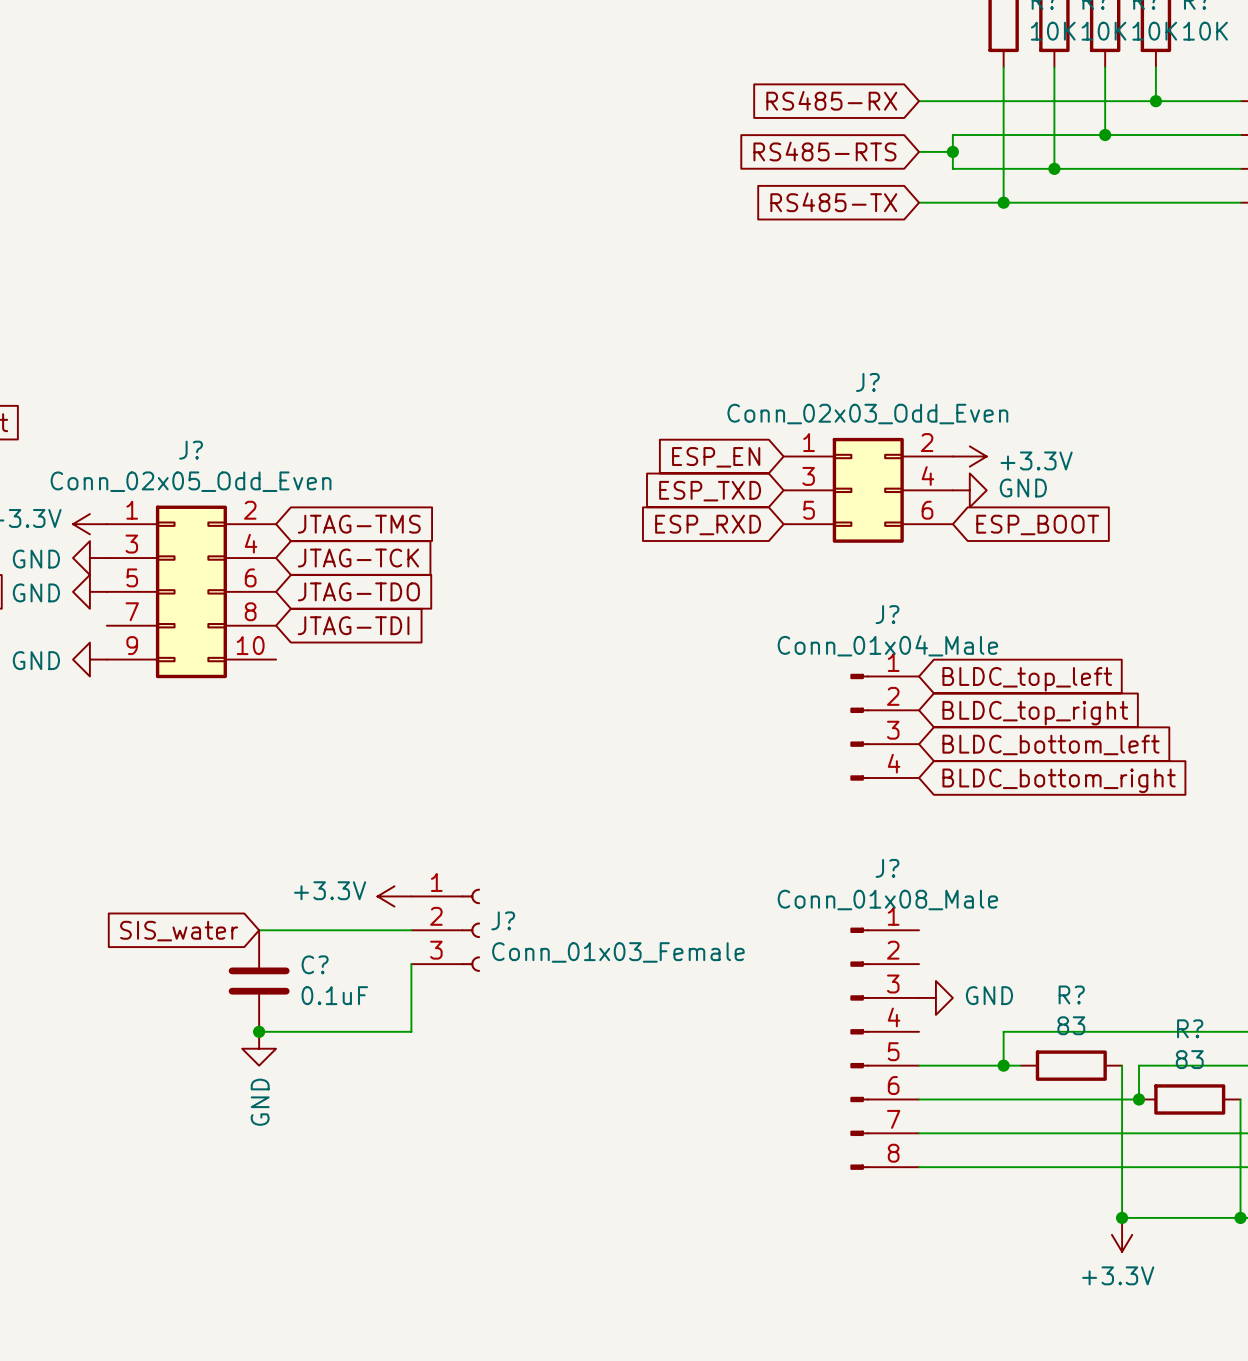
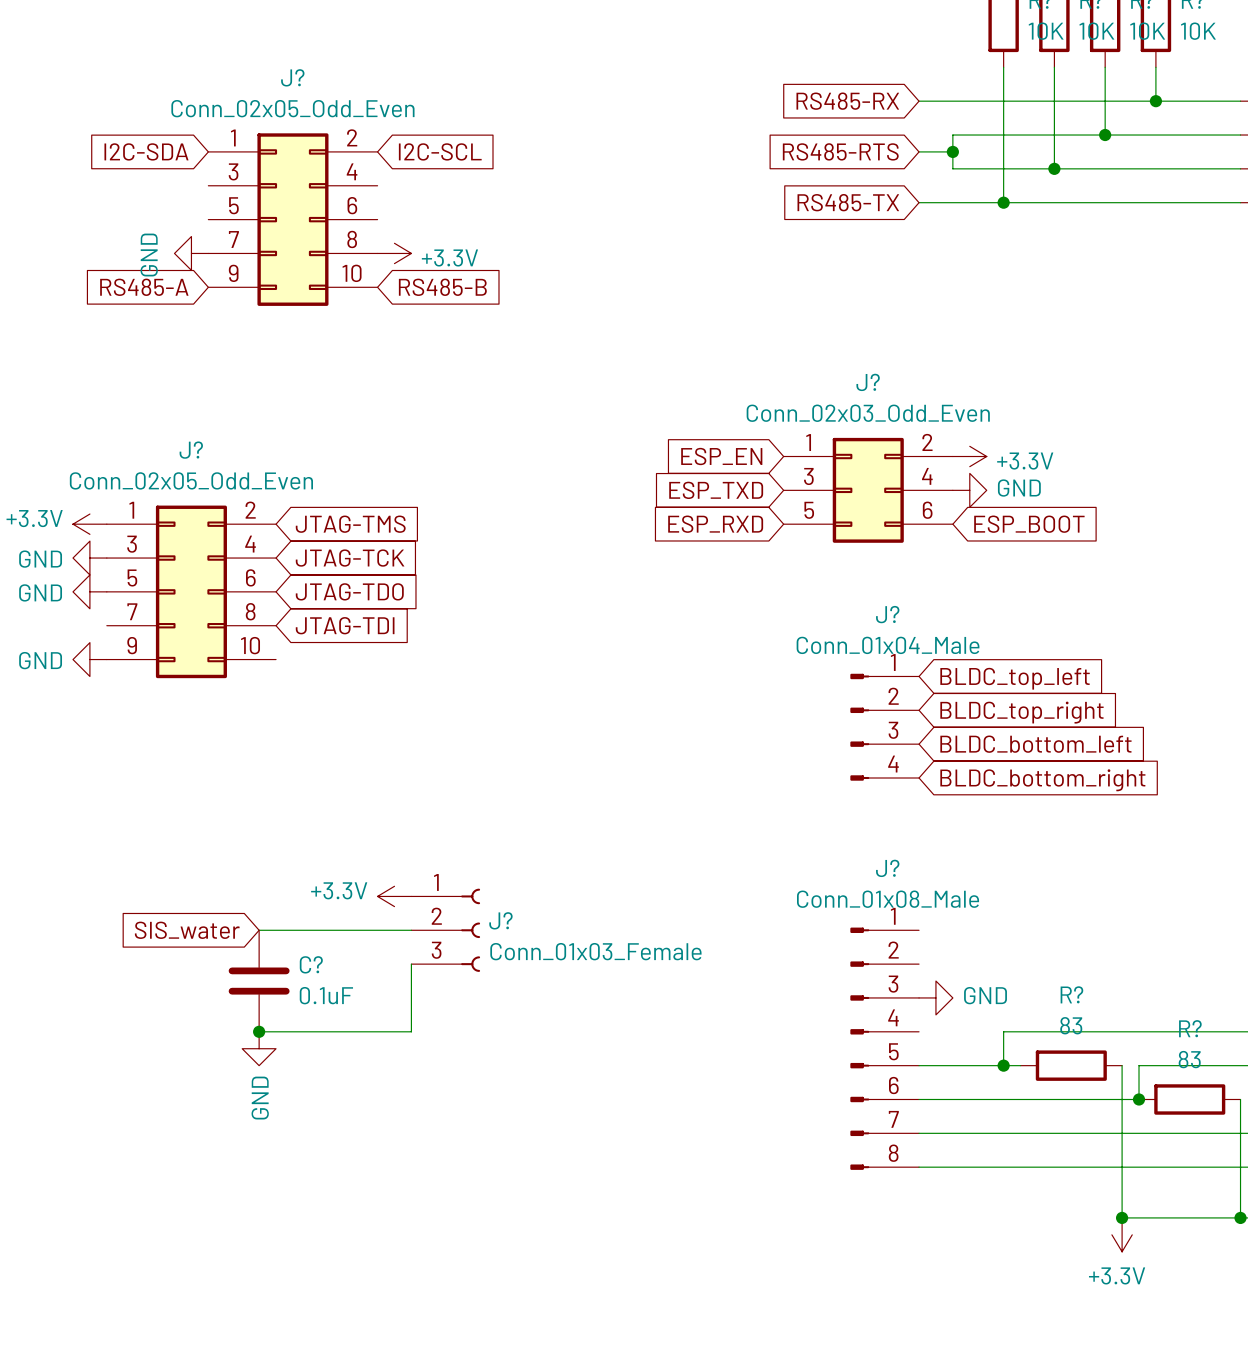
global label: none -> I2C-SDA (146, 151)
global label: none -> I2C-SCL (440, 151)
J?: none -> Conn_02x05_Odd_Even (292, 219)
power symbol: none -> GND (191, 253)
power symbol: none -> +3.3V (394, 253)
global label: none -> RS485-A (144, 287)
global label: none -> RS485-B (442, 287)

